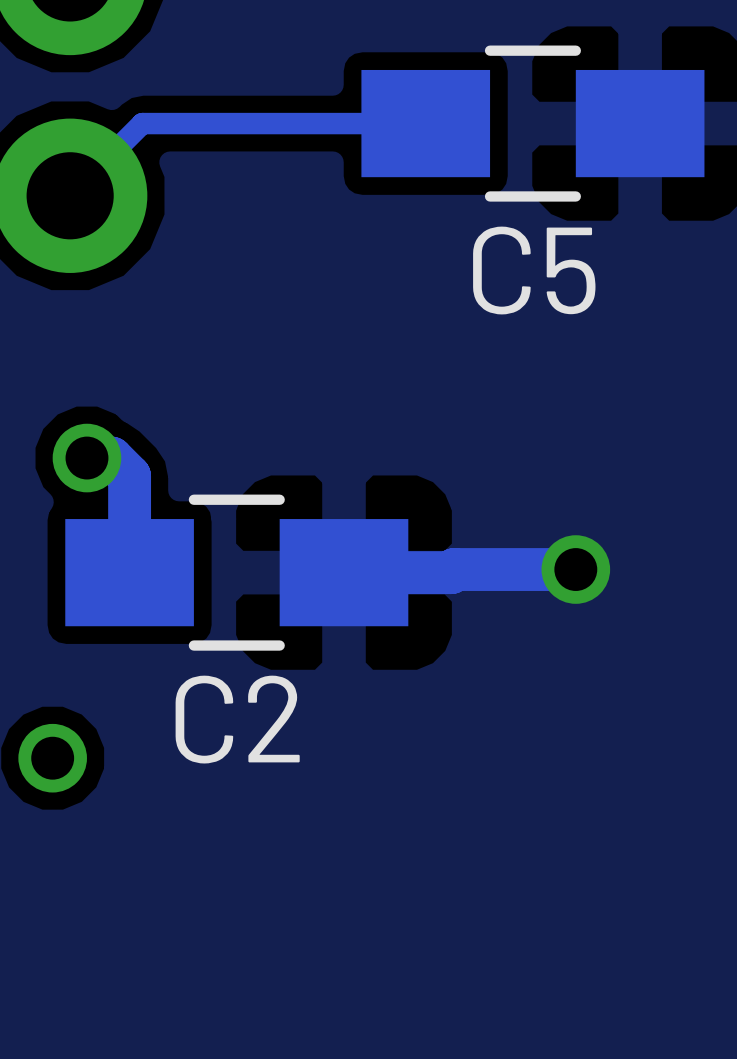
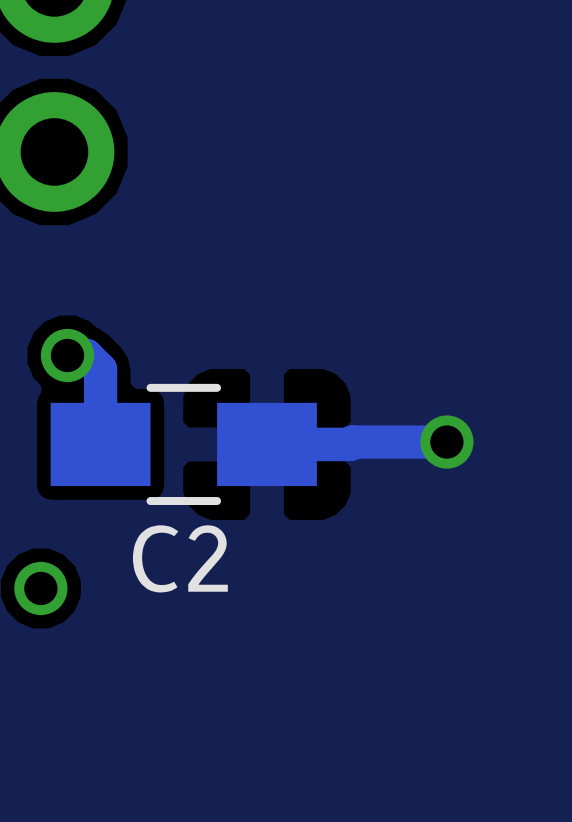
track: (425, 123) (142, 123) (70, 195) -> none
C5: (532, 123) -> none

